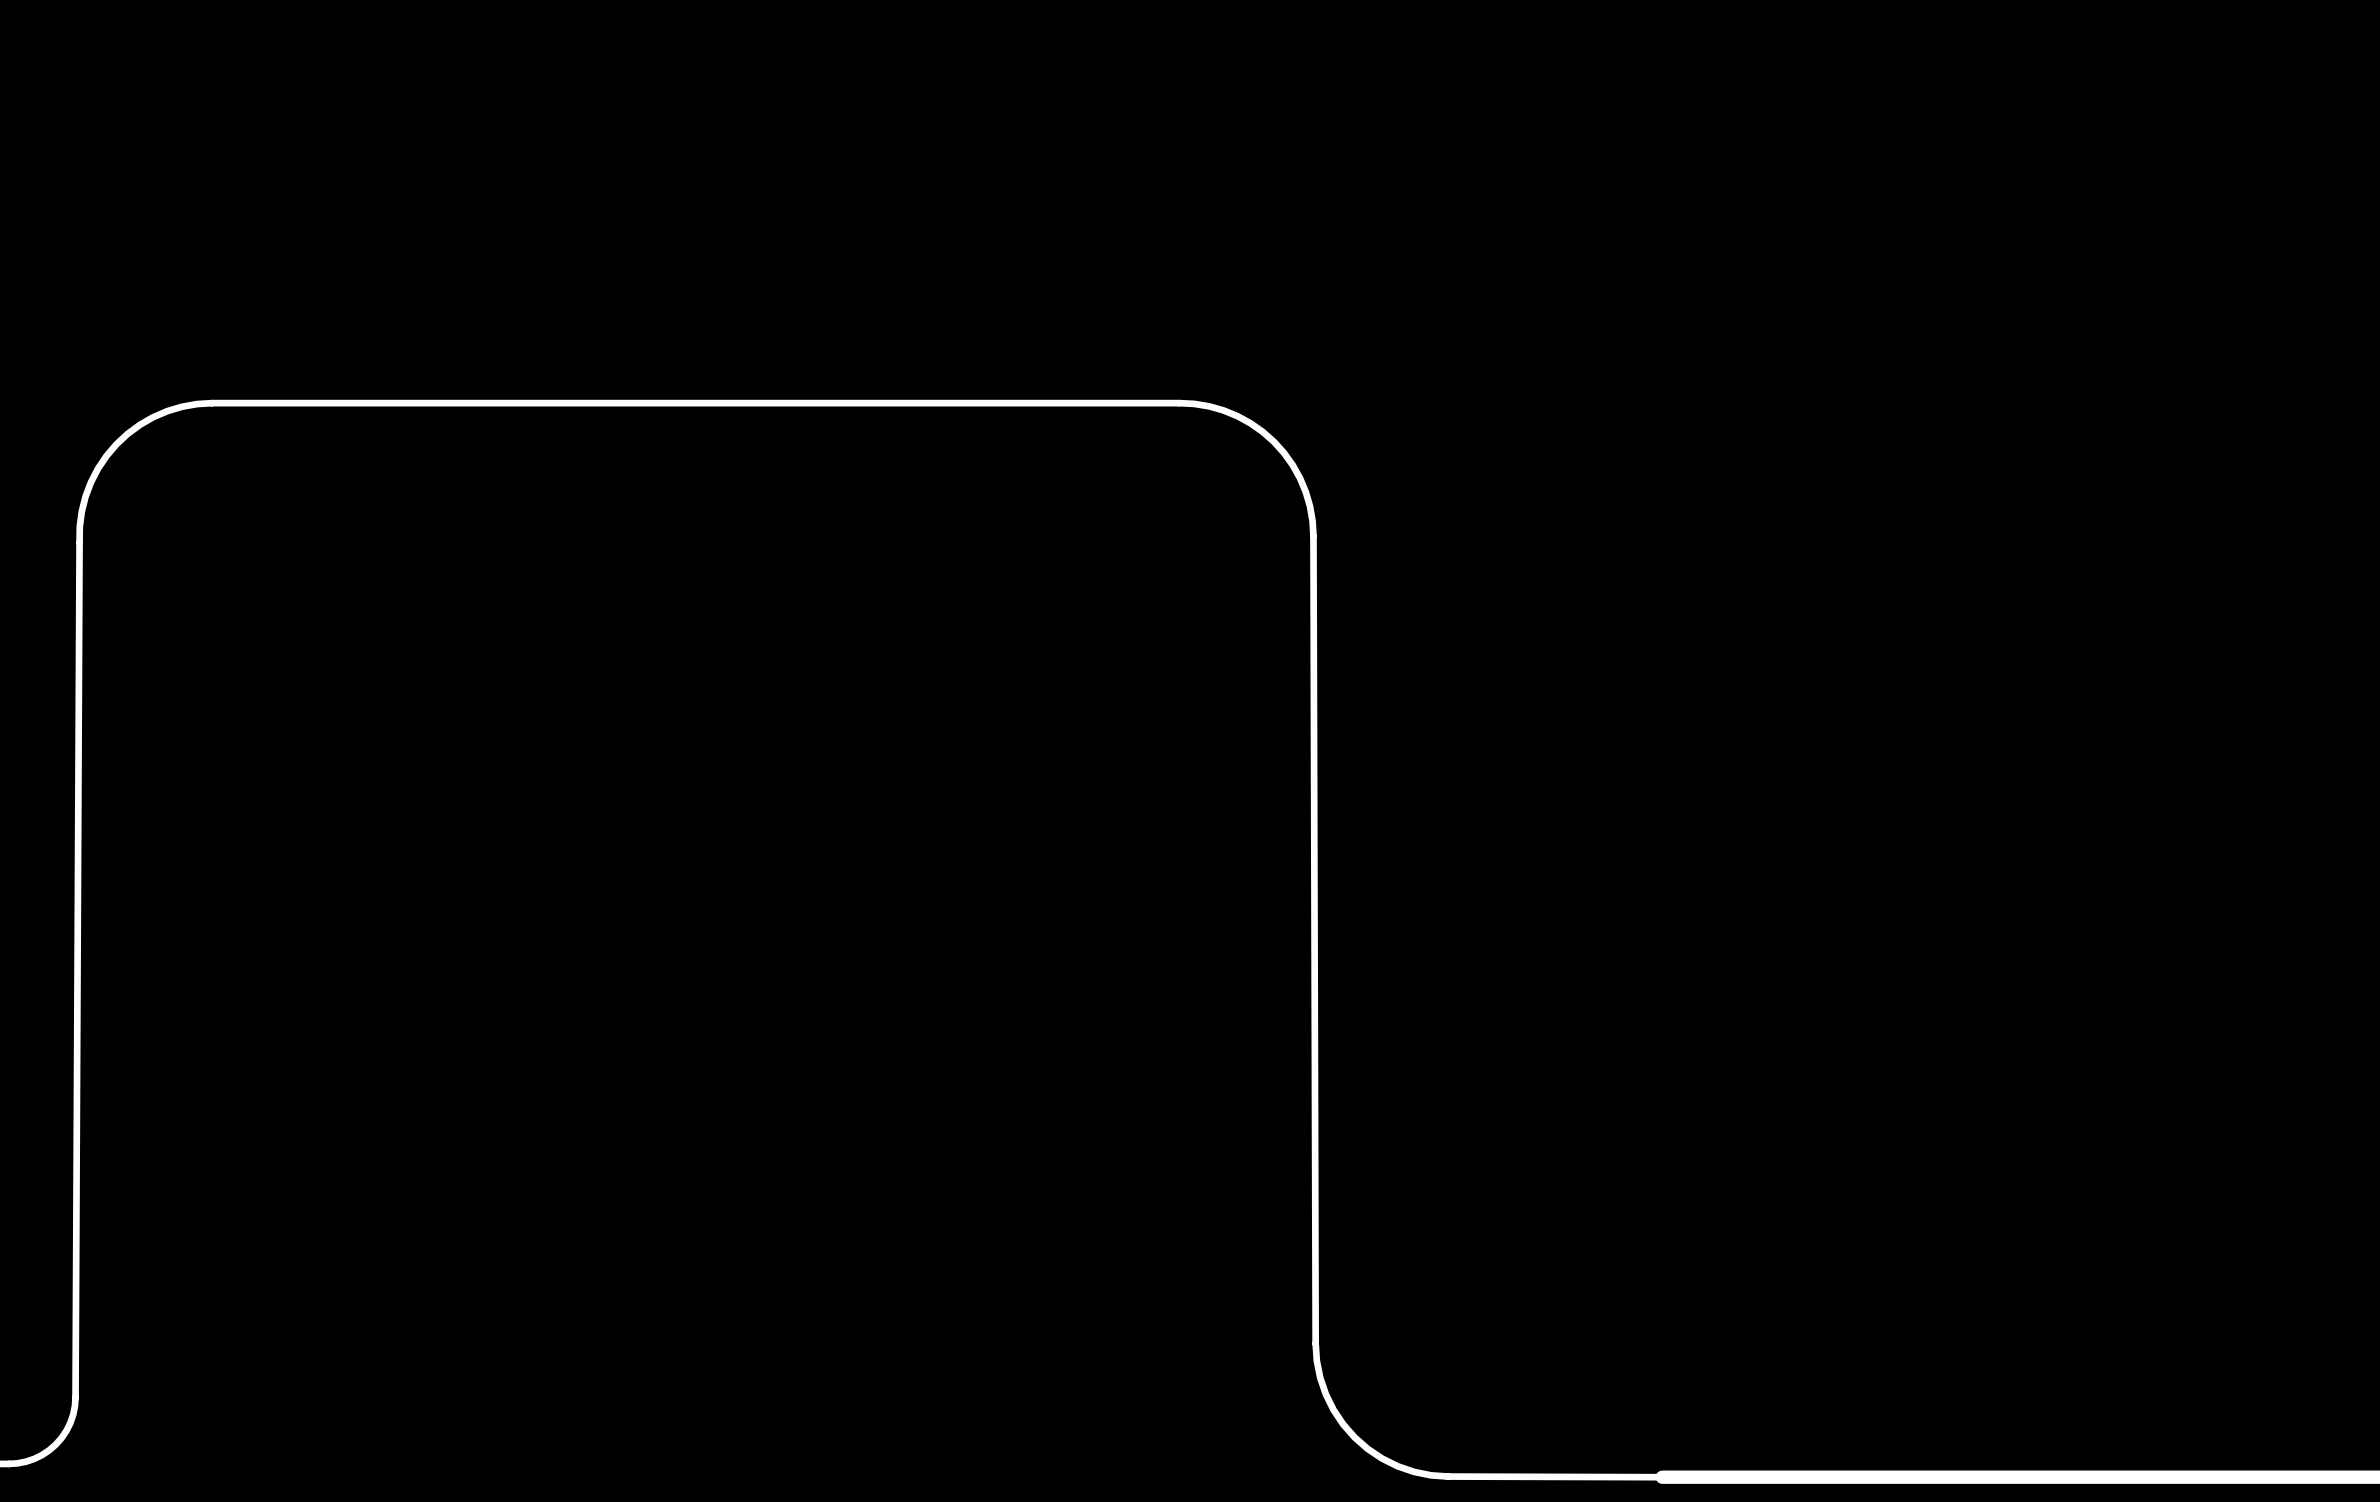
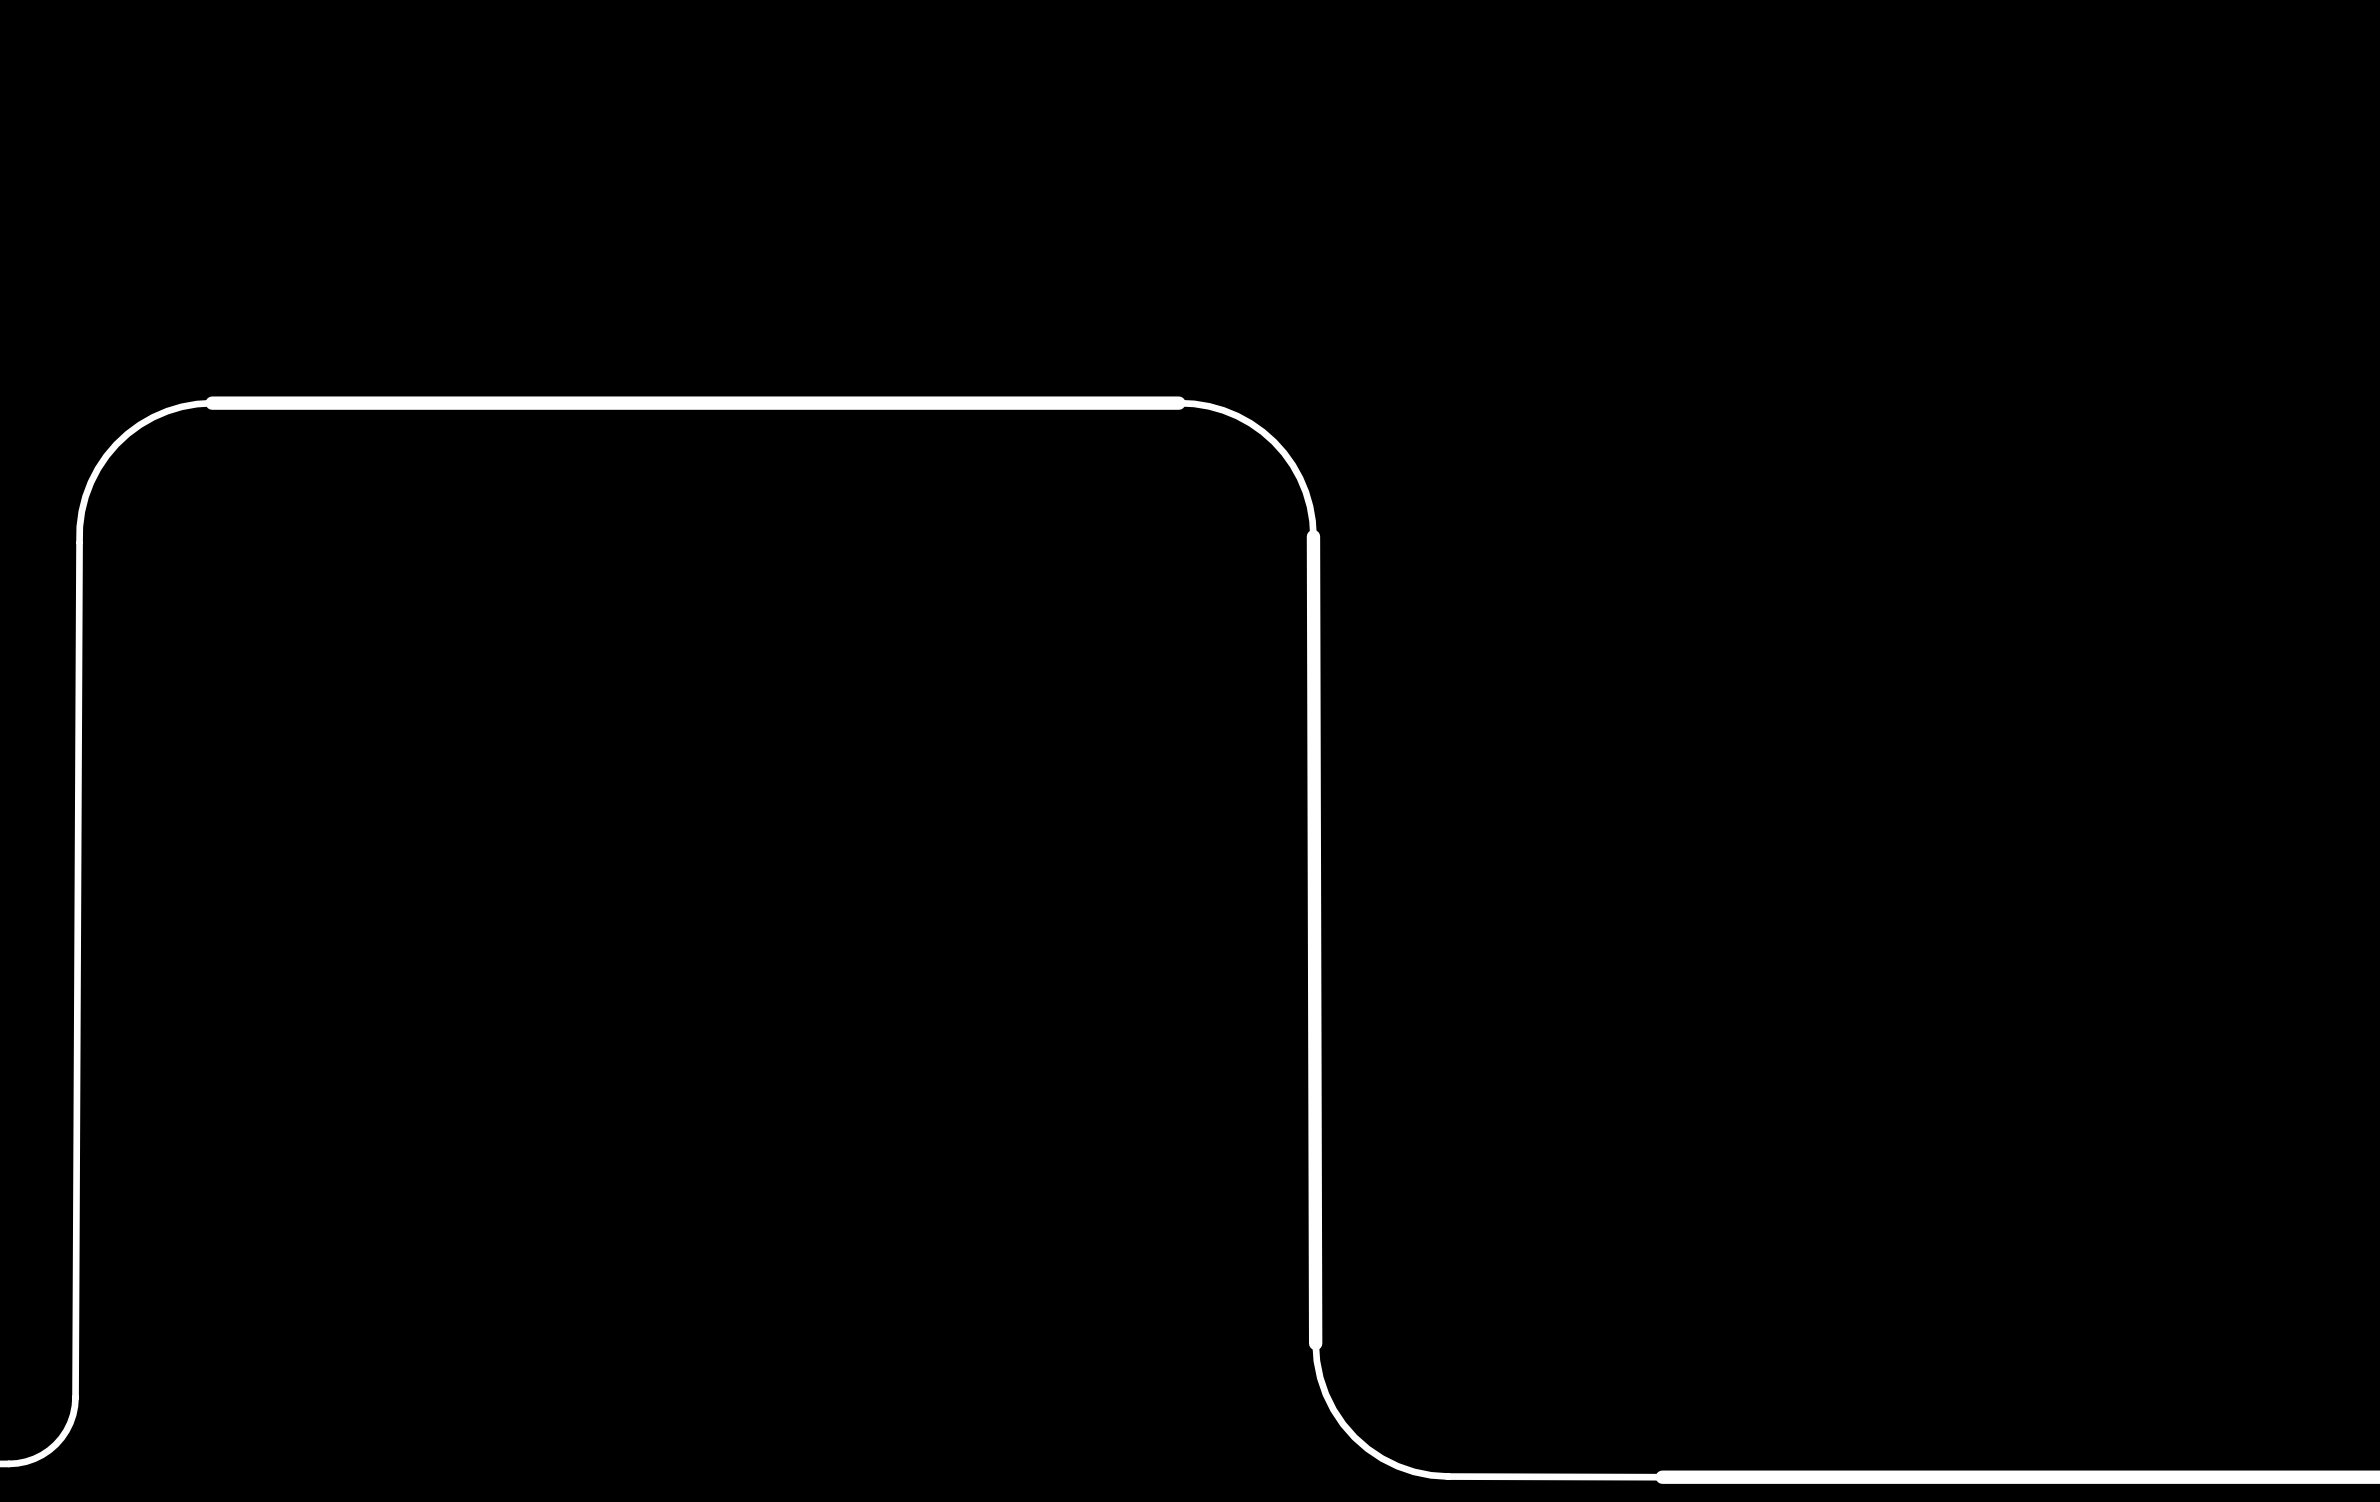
board edge width: thin (1178, 403) (212, 403) -> thick (1178, 403) (212, 403)
board edge width: thin (1313, 536) (1315, 1343) -> thick (1313, 536) (1315, 1343)

